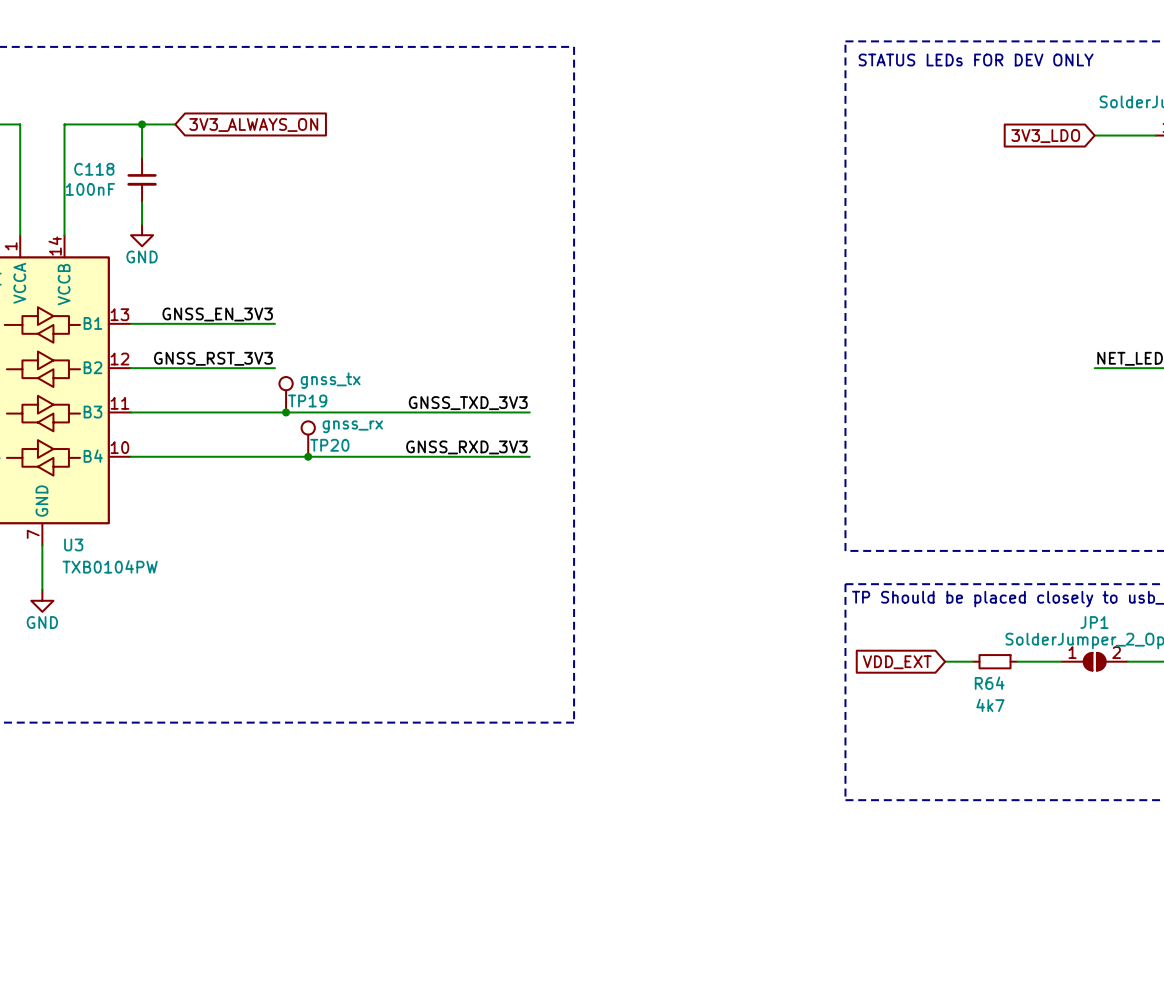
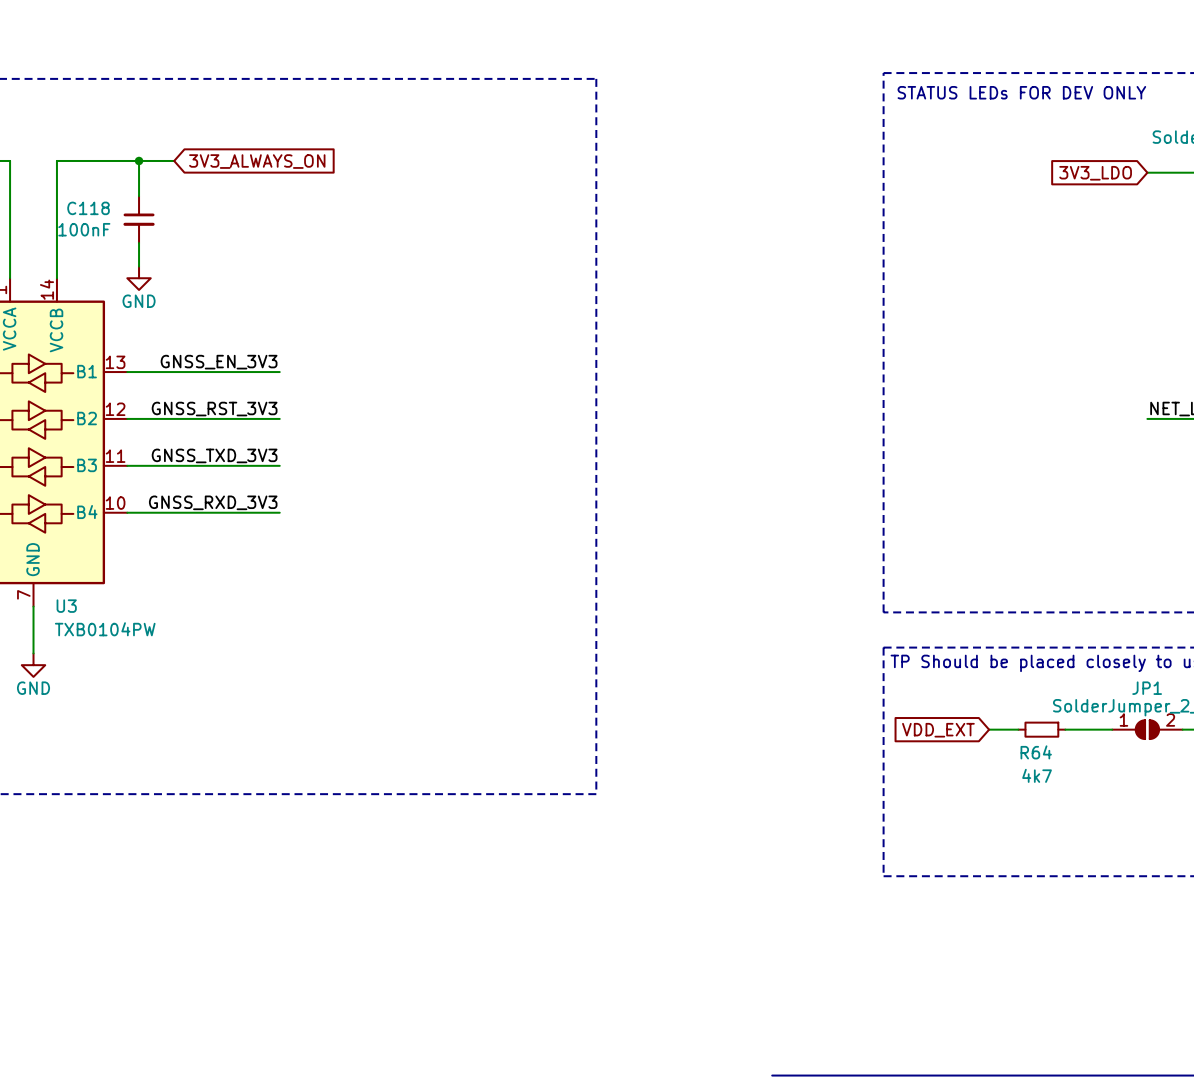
TP19: gnss_tx (286, 394) -> none
label: none -> GNSS_TXD_3V3 (214, 455)
label: GNSS_TXD_3V3 (468, 403) -> none
wire: (274, 412) (529, 412) -> none
junction: (286, 412) -> none
TP20: gnss_rx (308, 439) -> none
label: none -> GNSS_RXD_3V3 (213, 502)
label: GNSS_RXD_3V3 (466, 447) -> none
wire: (274, 456) (529, 456) -> none
junction: (308, 456) -> none

